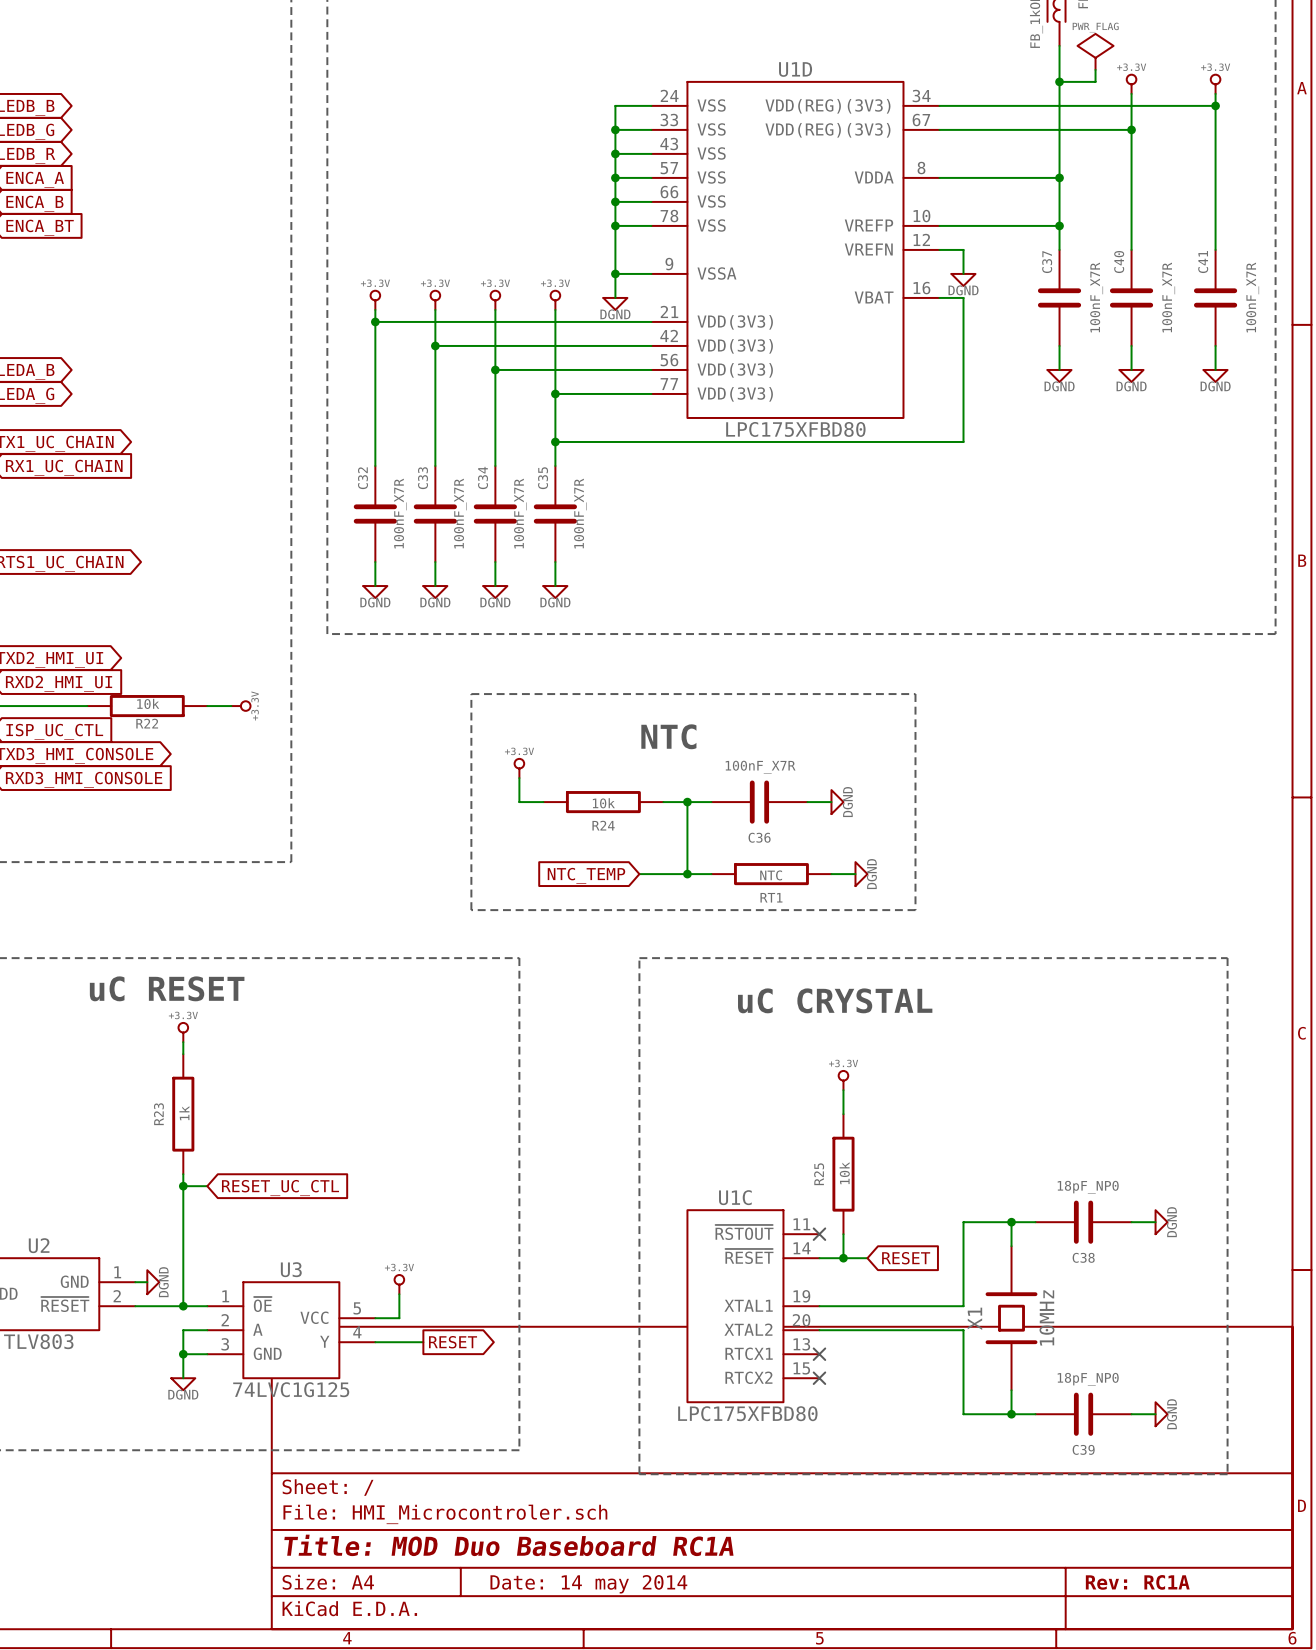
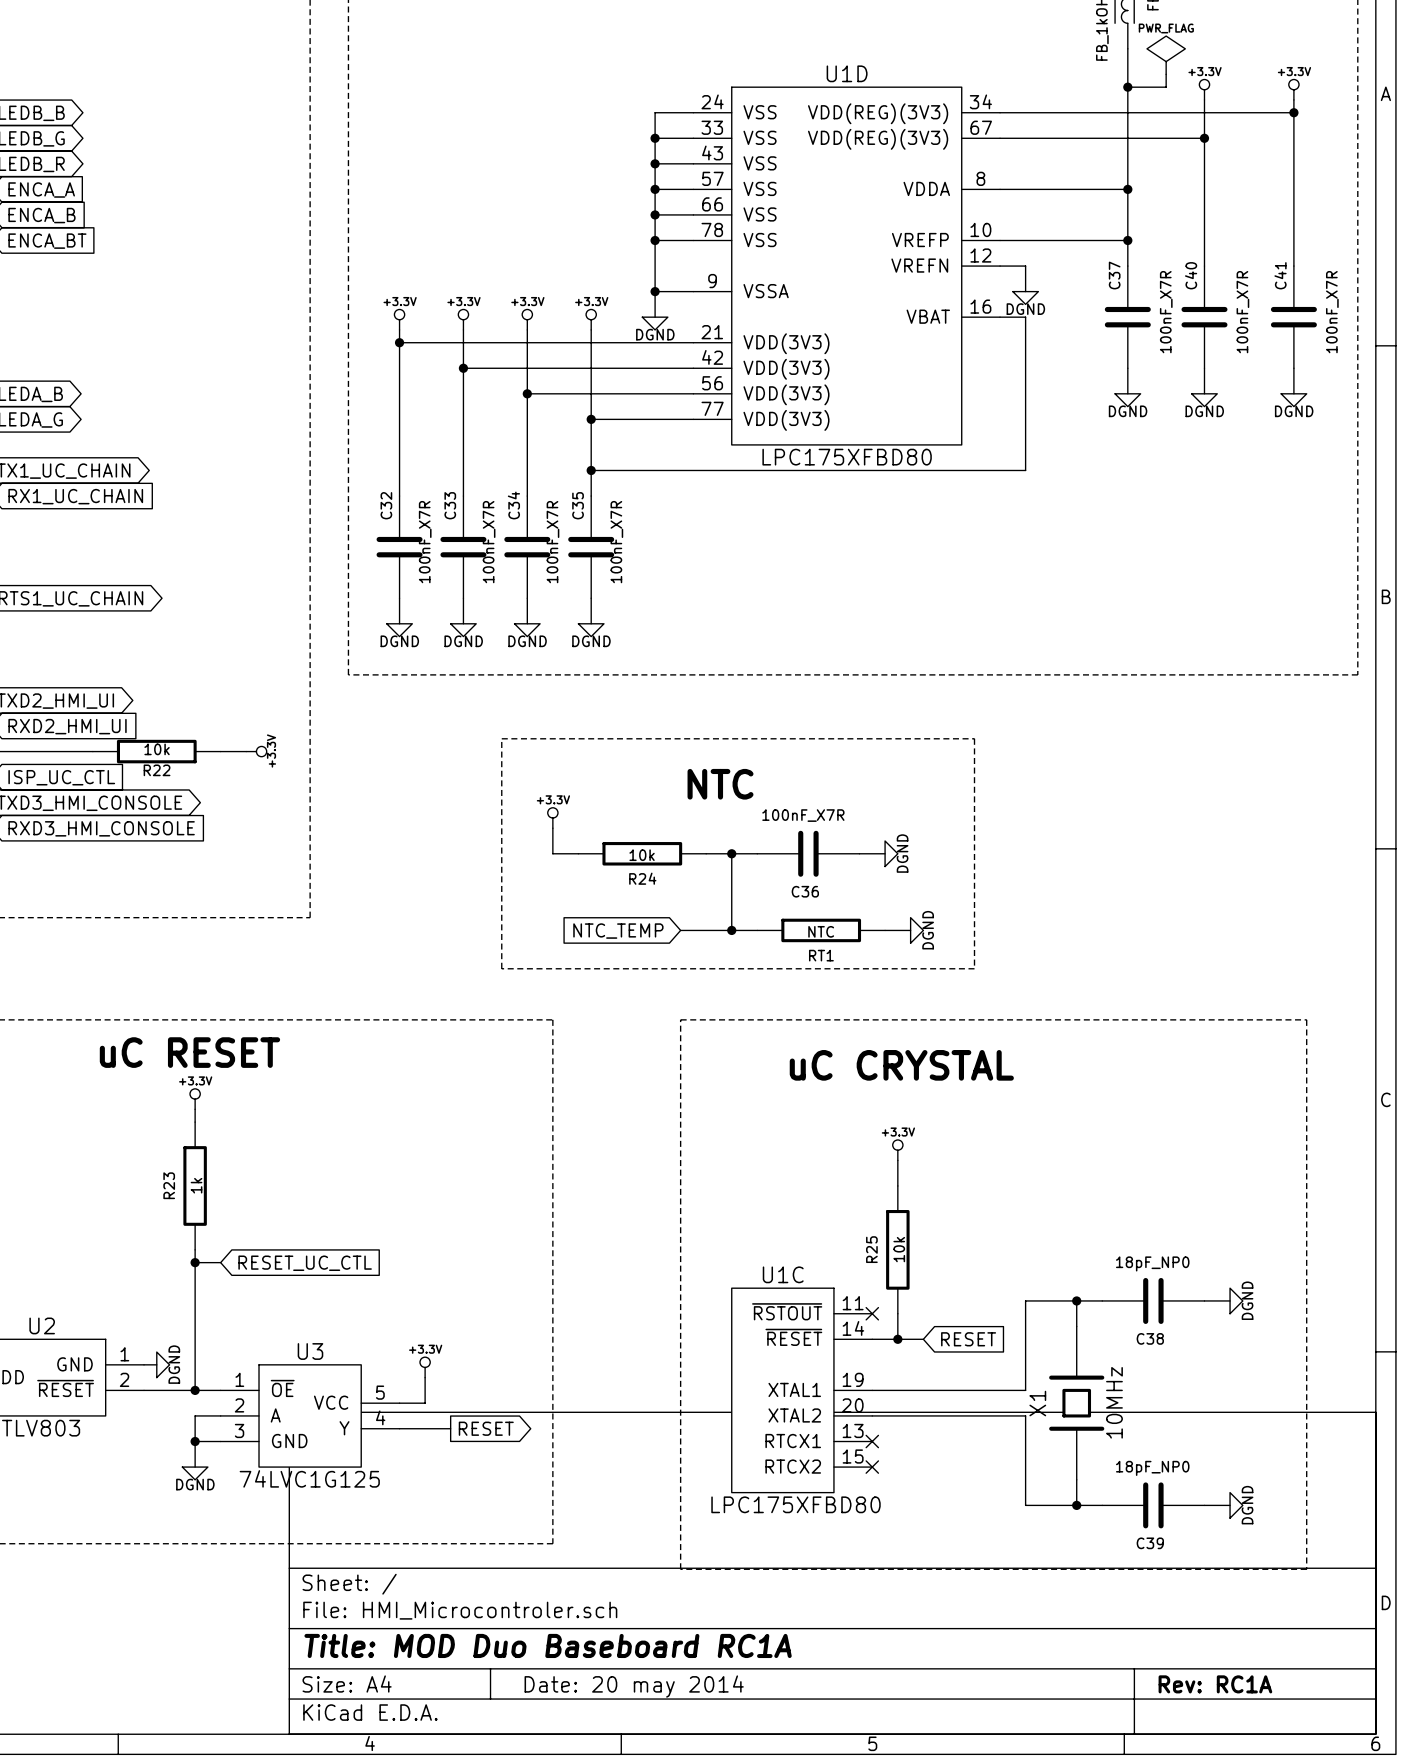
title block: Date: 14 may 2014 (588, 1584) -> Date: 20 may 2014 (634, 1686)

